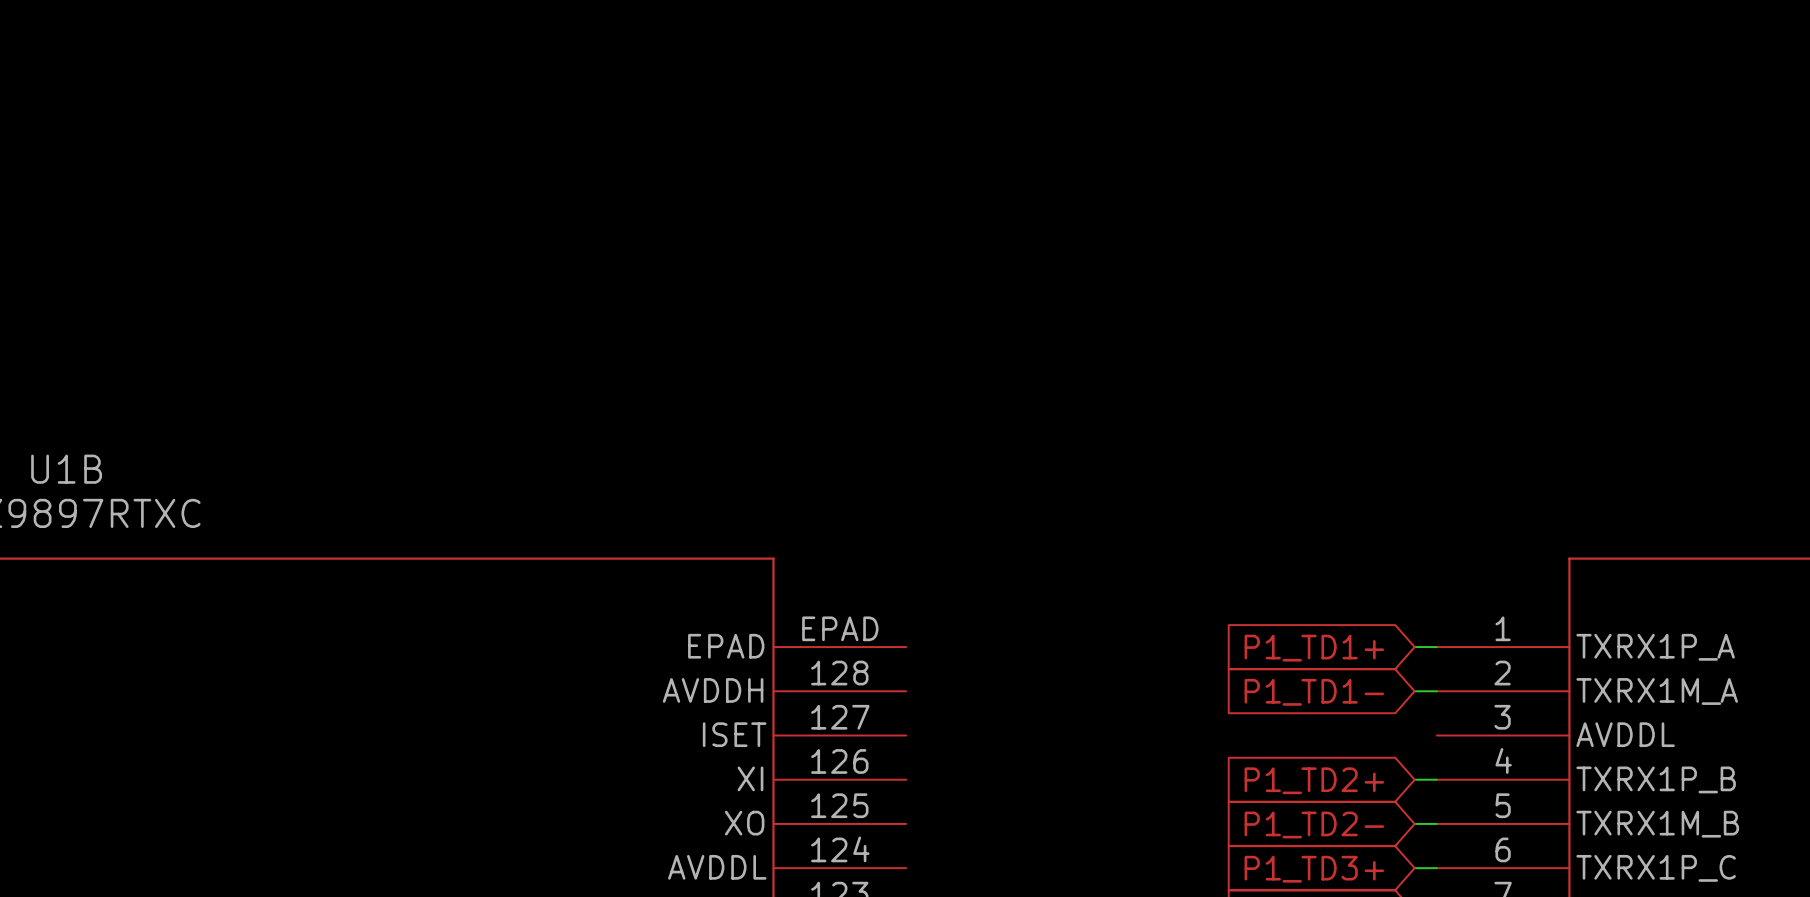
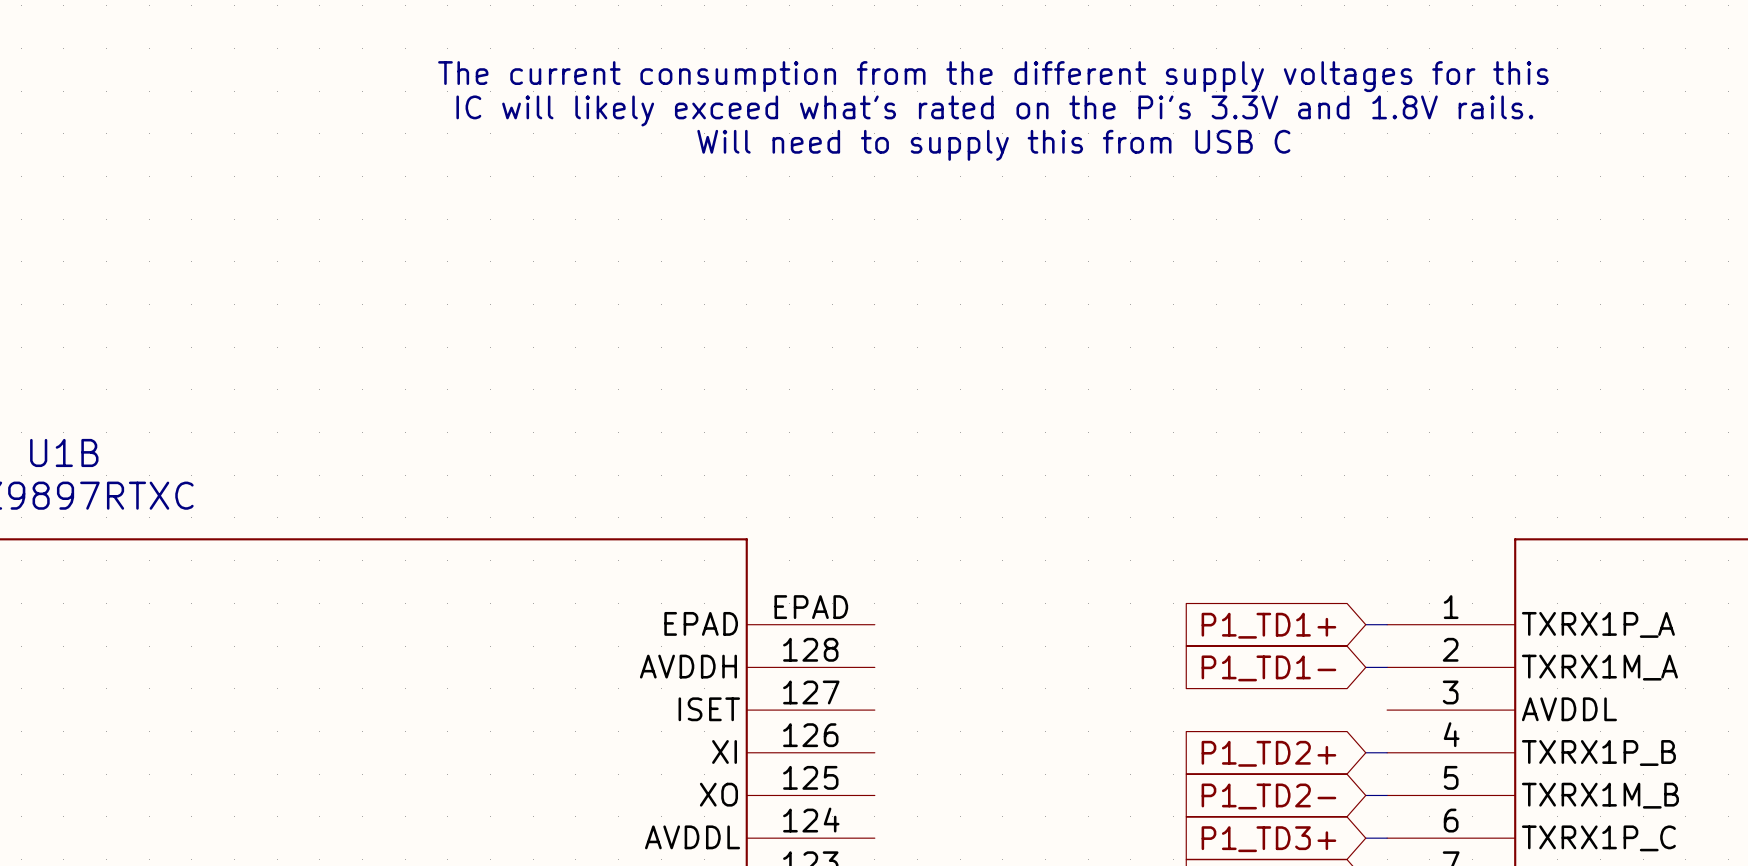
text: none -> The current consumption from the different supply voltages for this (993, 76)
text: none -> IC will likely exceed what's rated on the Pi's 3.3V and 1.8V rails. (994, 110)
text: none -> Will need to supply this from USB C (993, 145)

